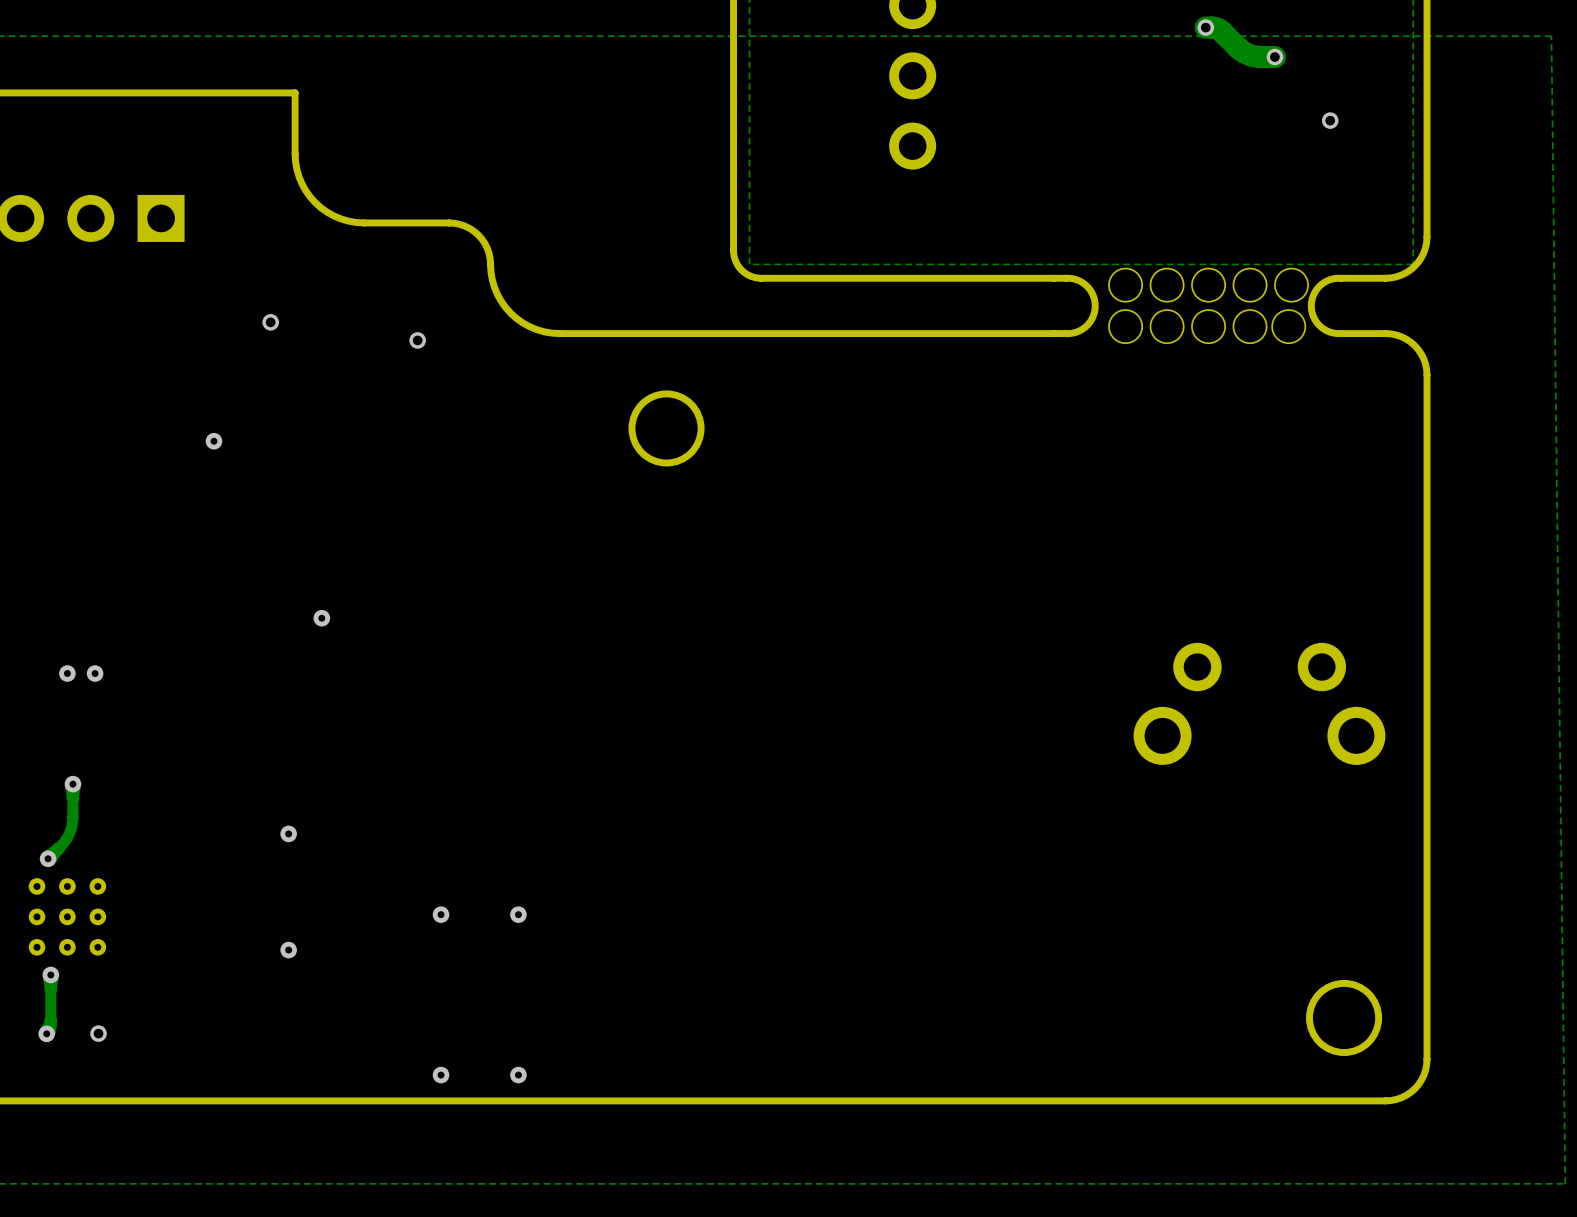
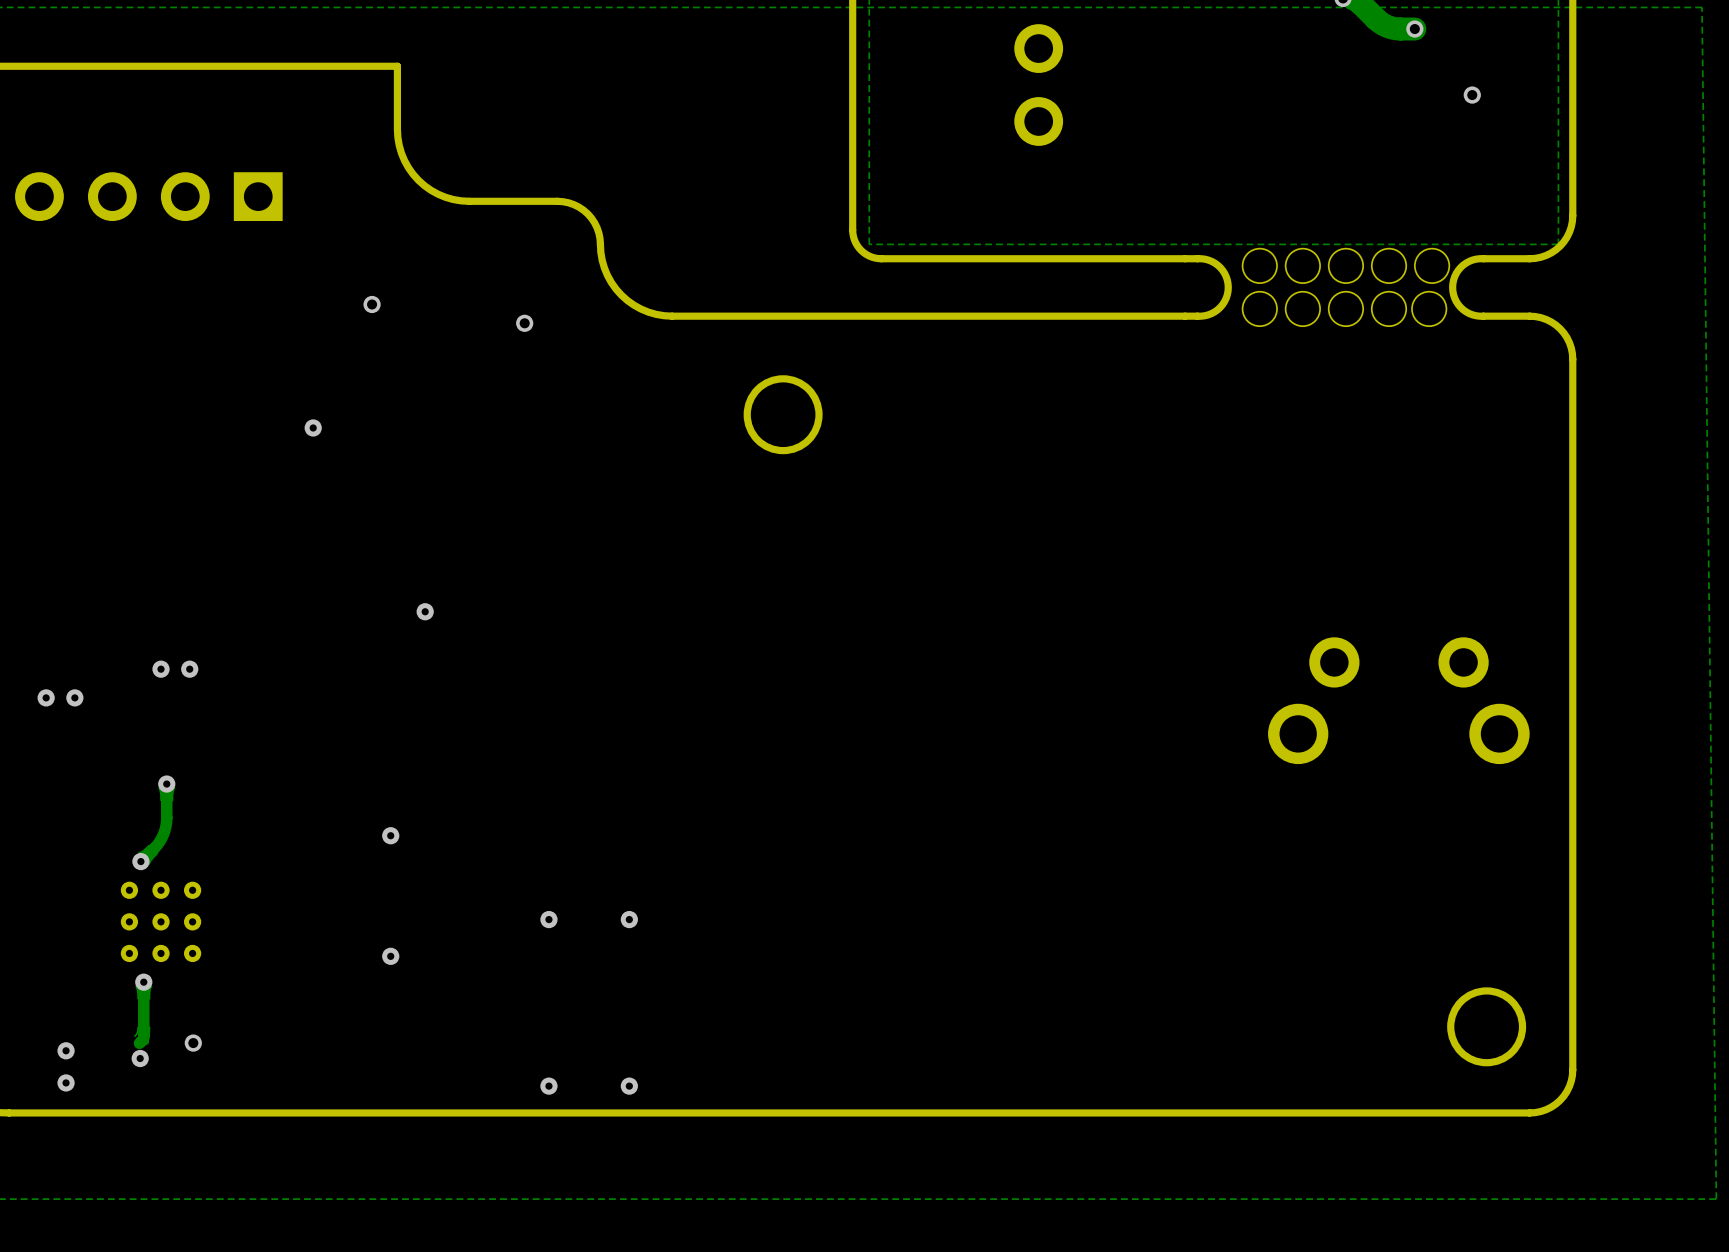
via position: (46, 1033) -> (140, 1058)

